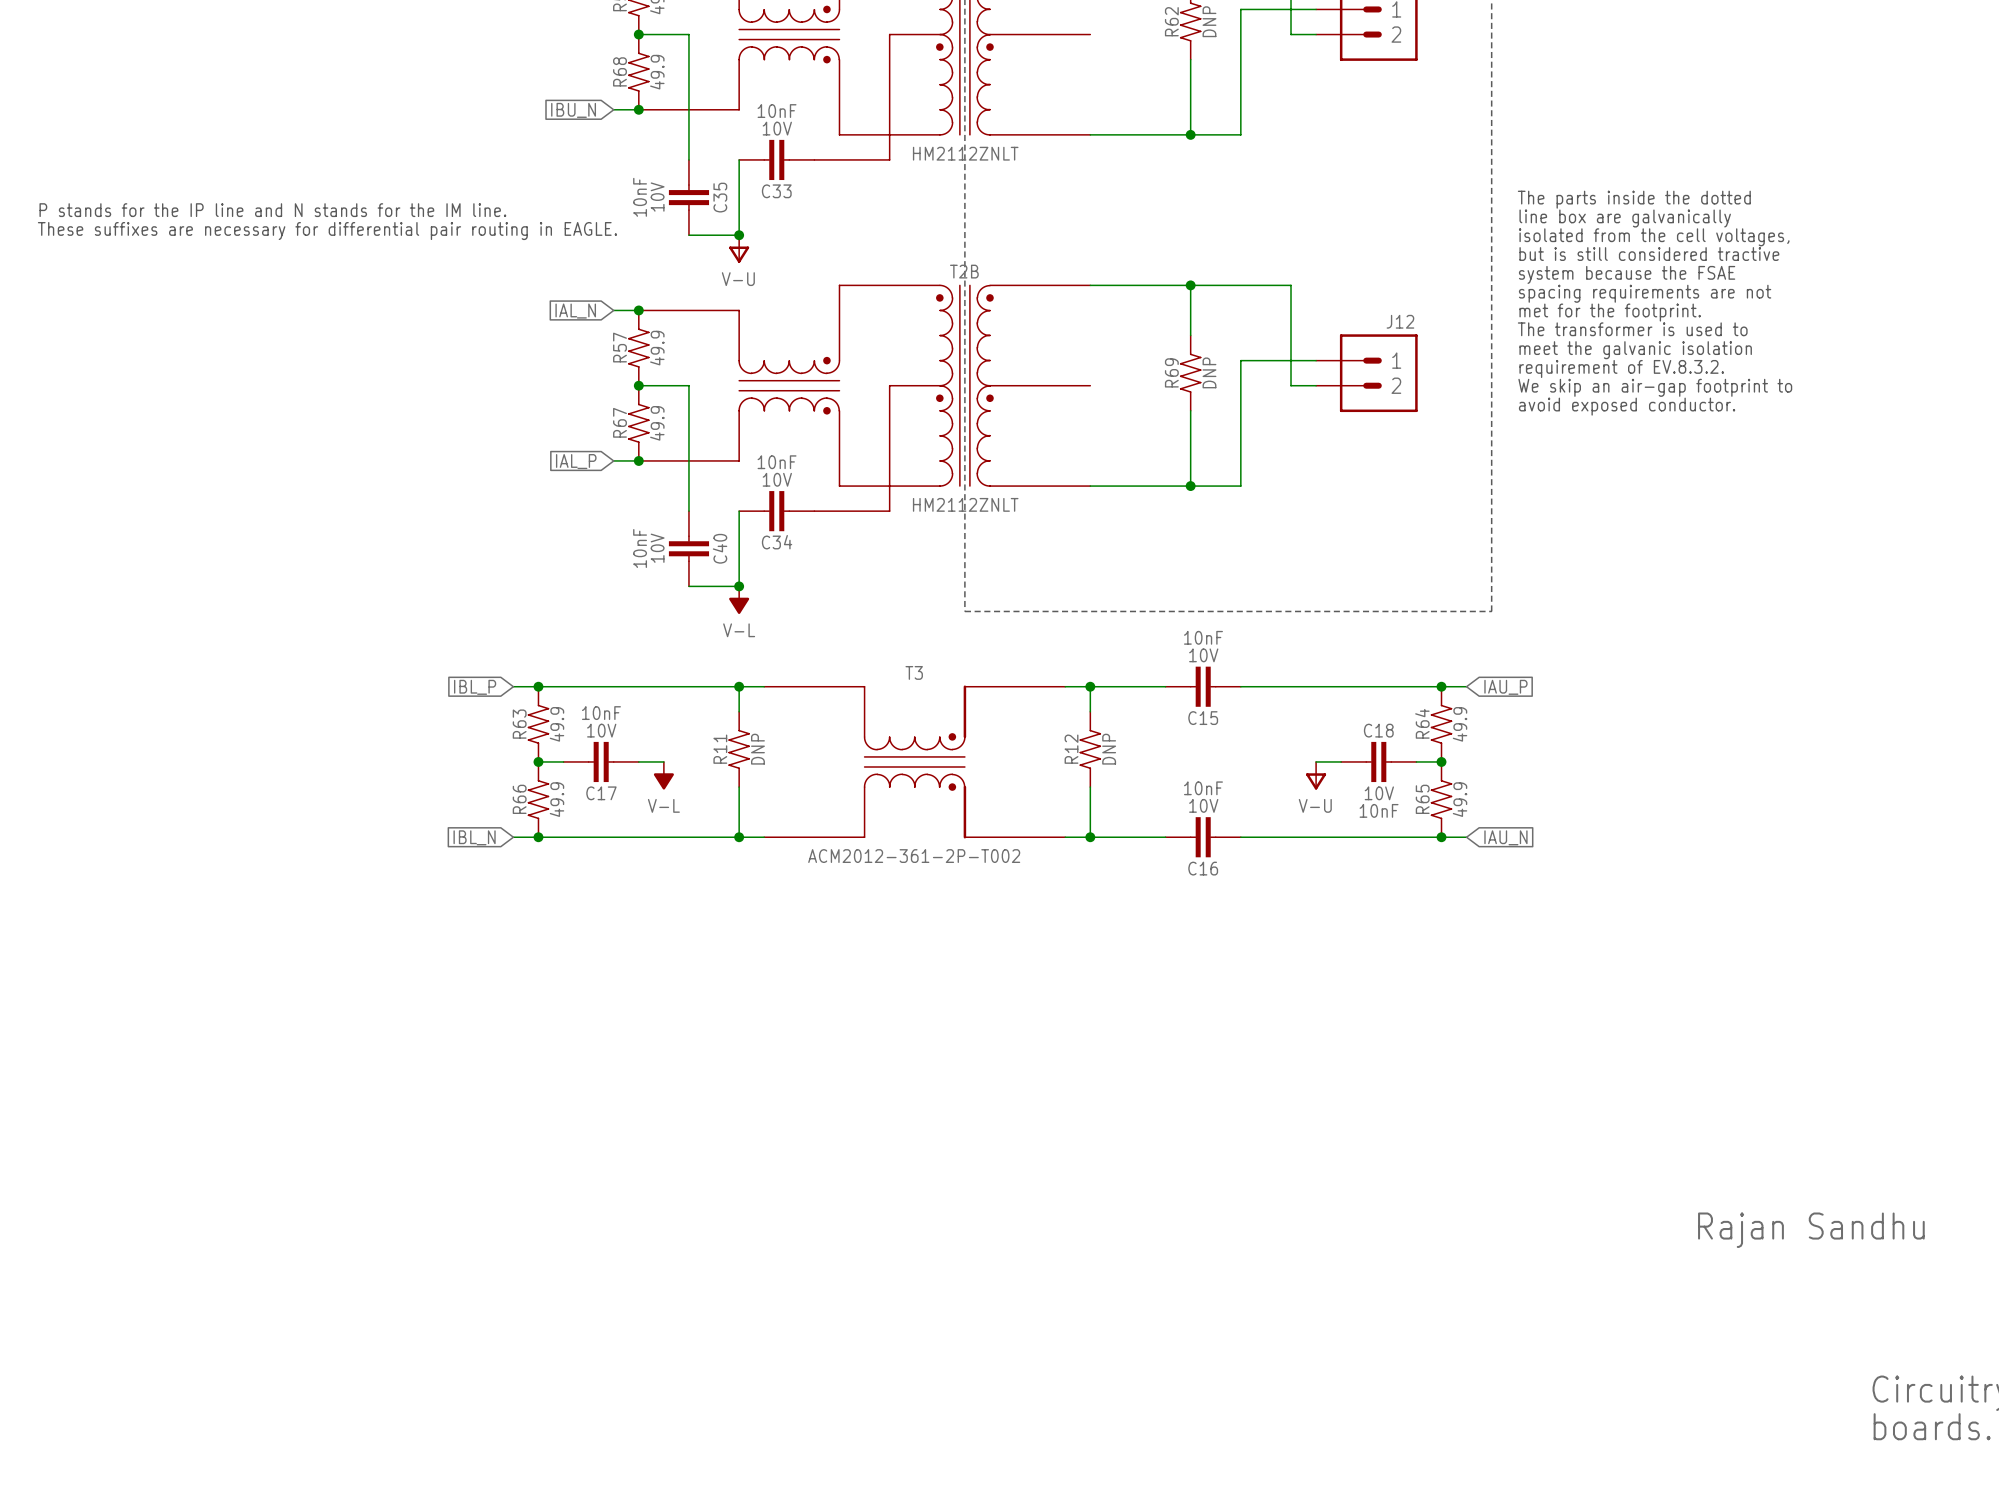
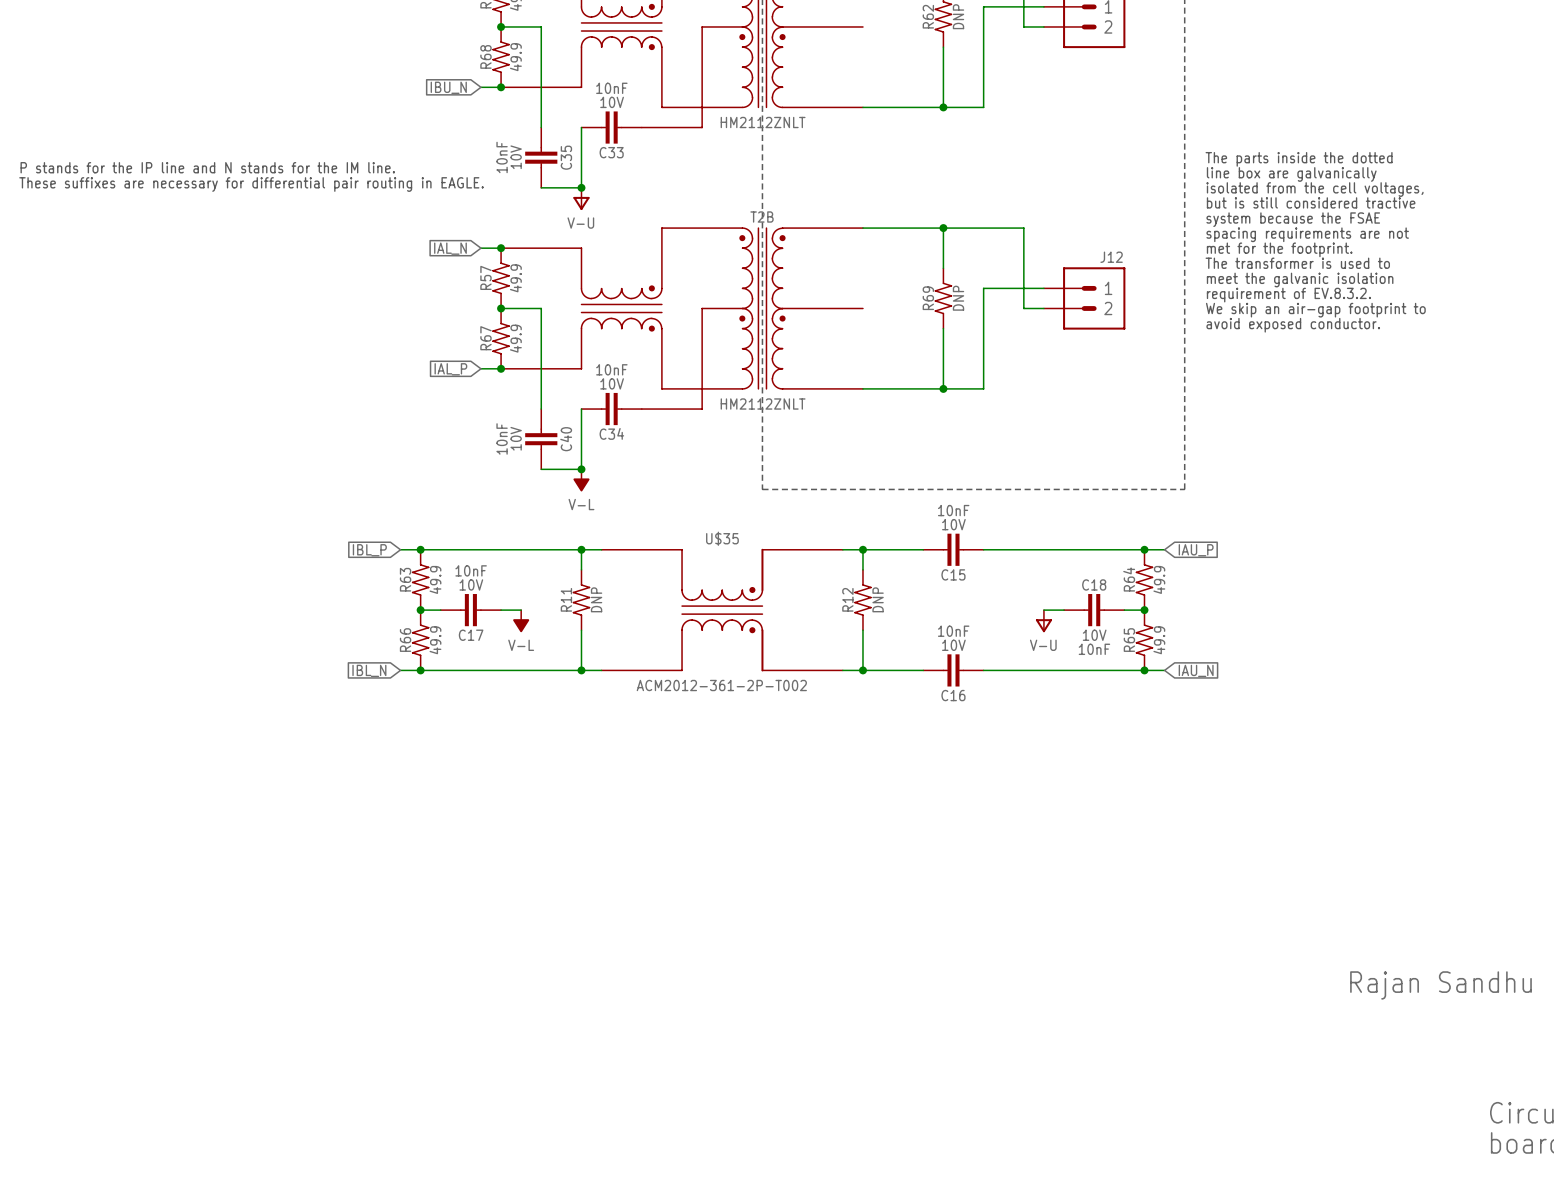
T3 name: T3 (914, 672) -> U$35 (722, 538)

